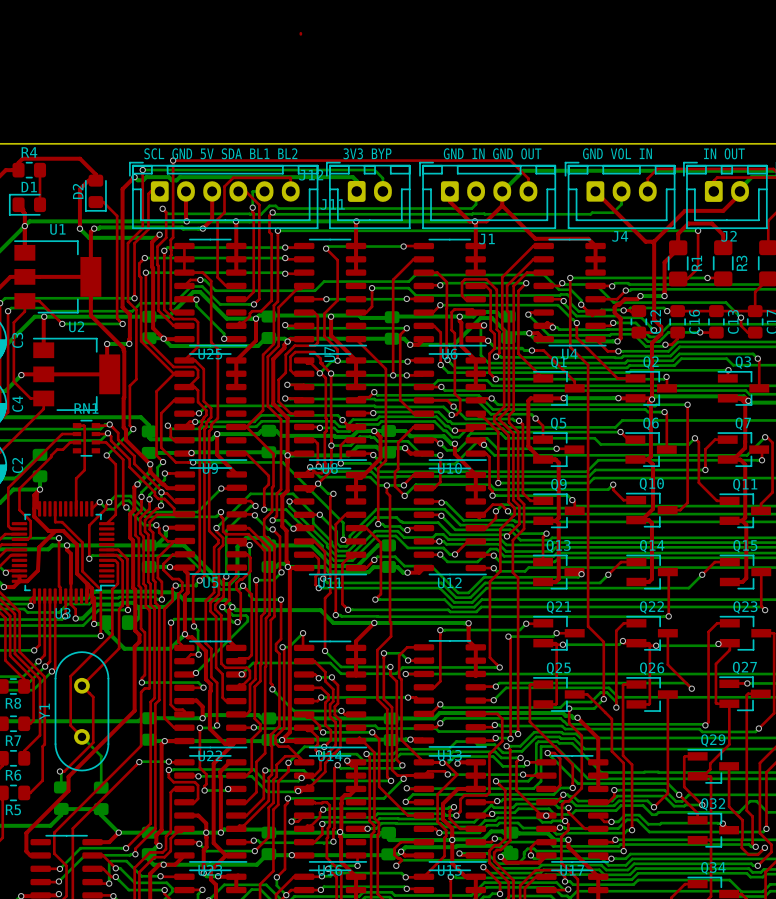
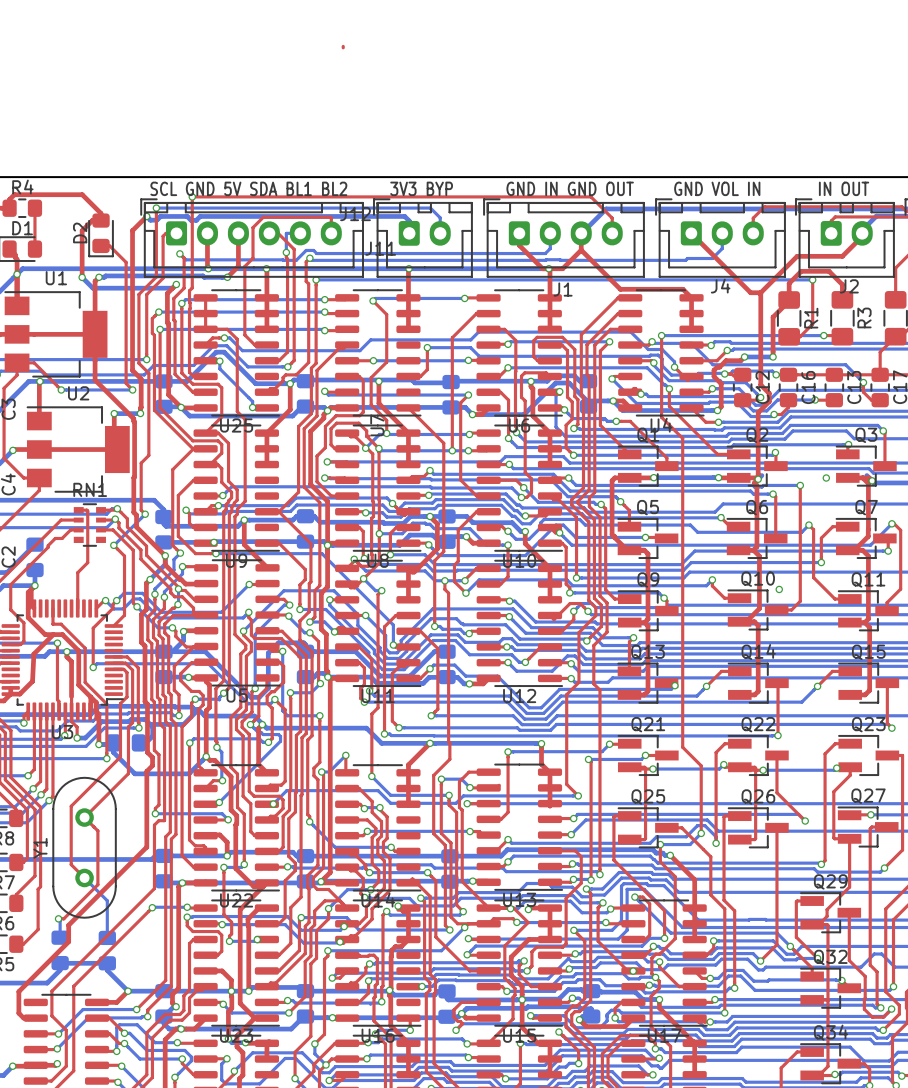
bottom track: (655, 396) (743, 396) -> none
via: none -> (826, 478)
via: none -> (779, 589)

